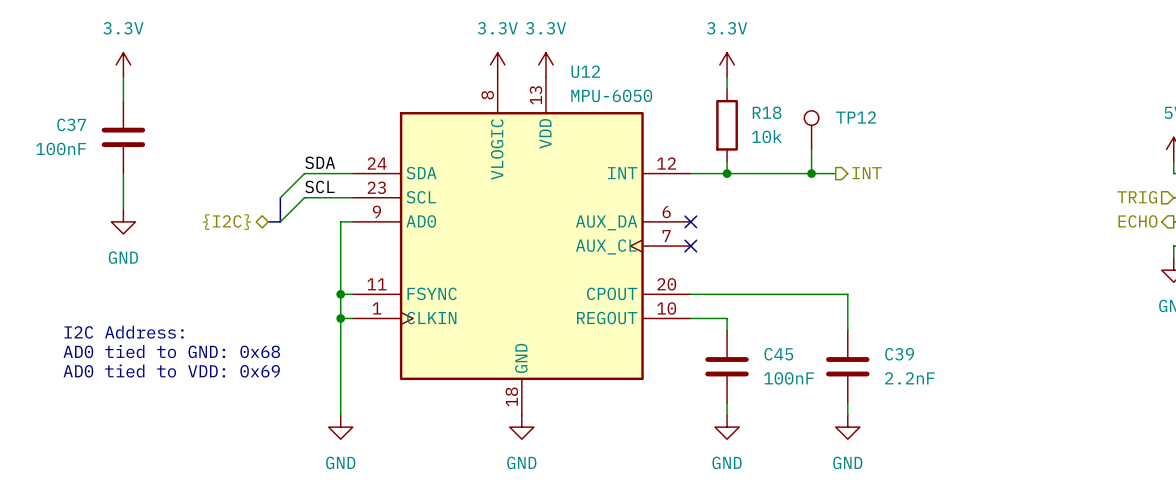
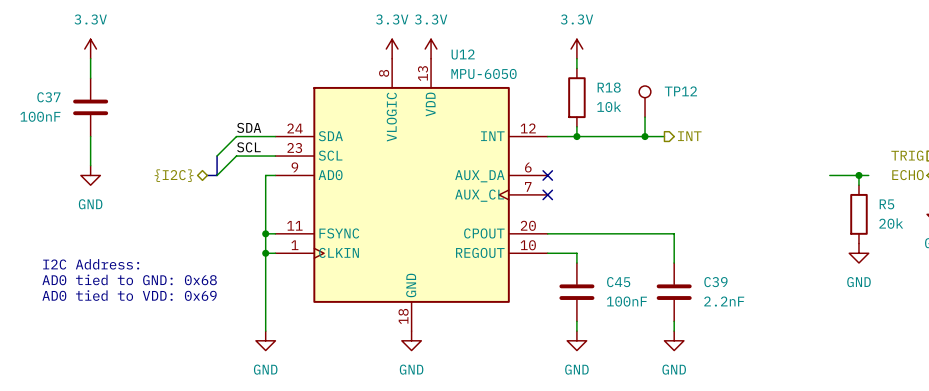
wire: none -> (829, 175) (868, 175)
wire: none -> (858, 175) (858, 185)
junction: none -> (858, 175)
R5: none -> 20k (858, 214)
power symbol: none -> GND (858, 253)

